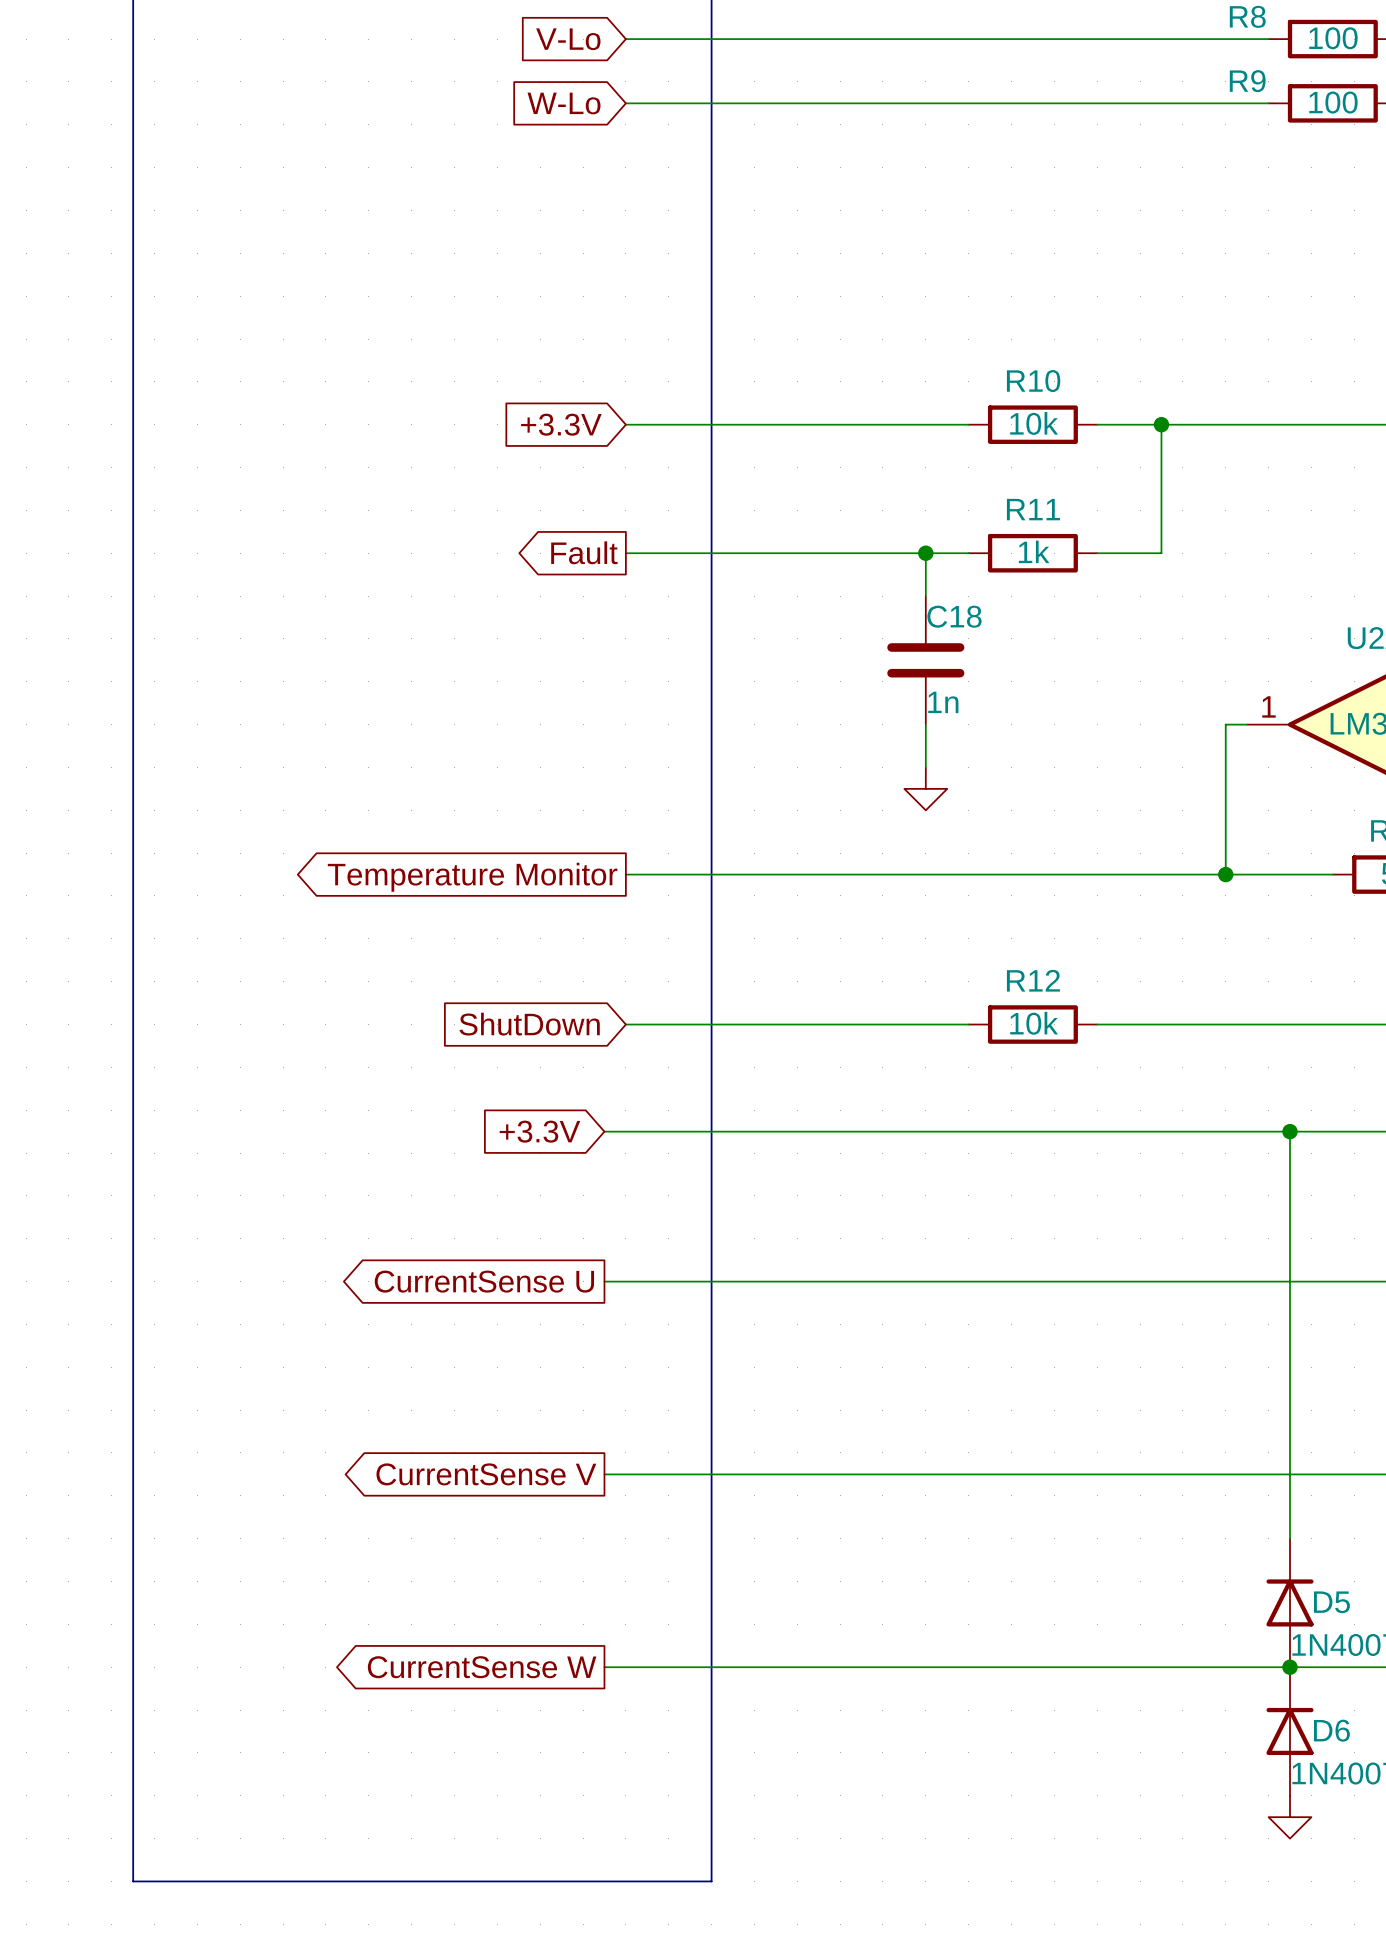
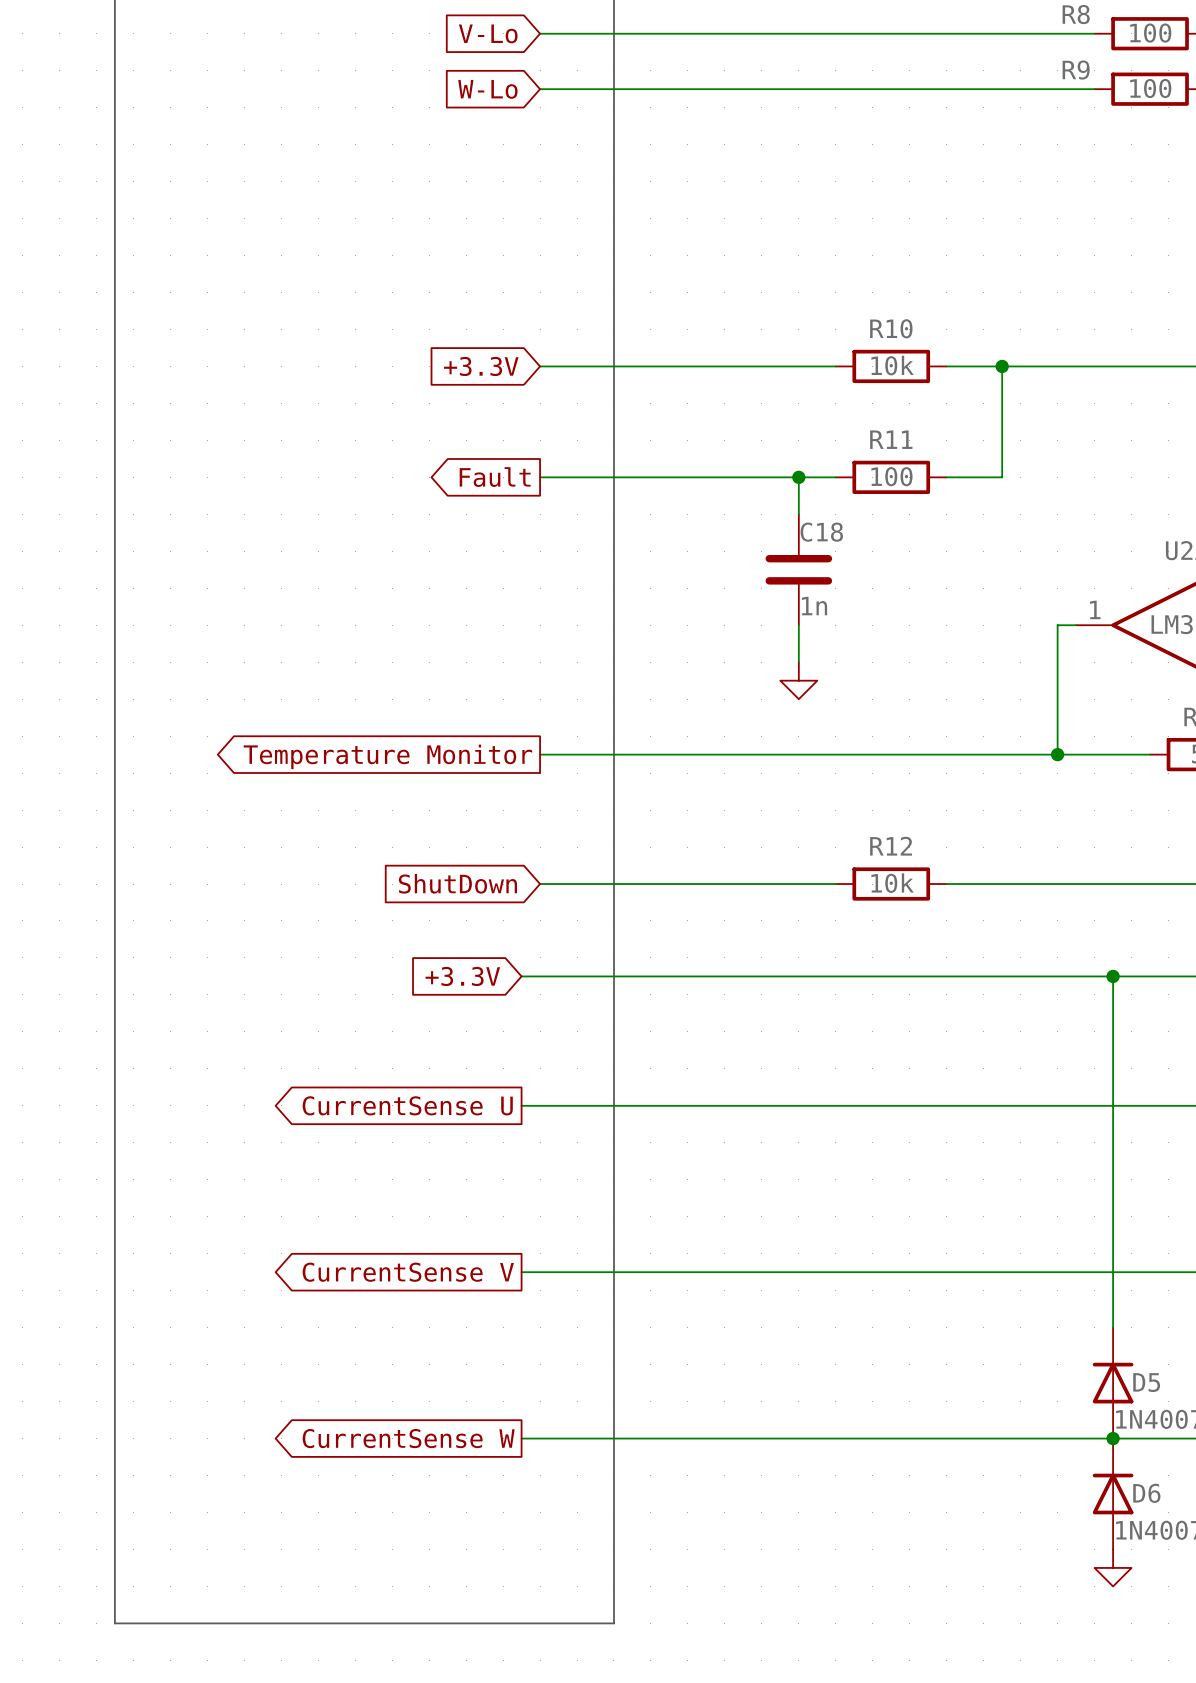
R11 value: 1k (1034, 551) -> 100 (891, 476)

